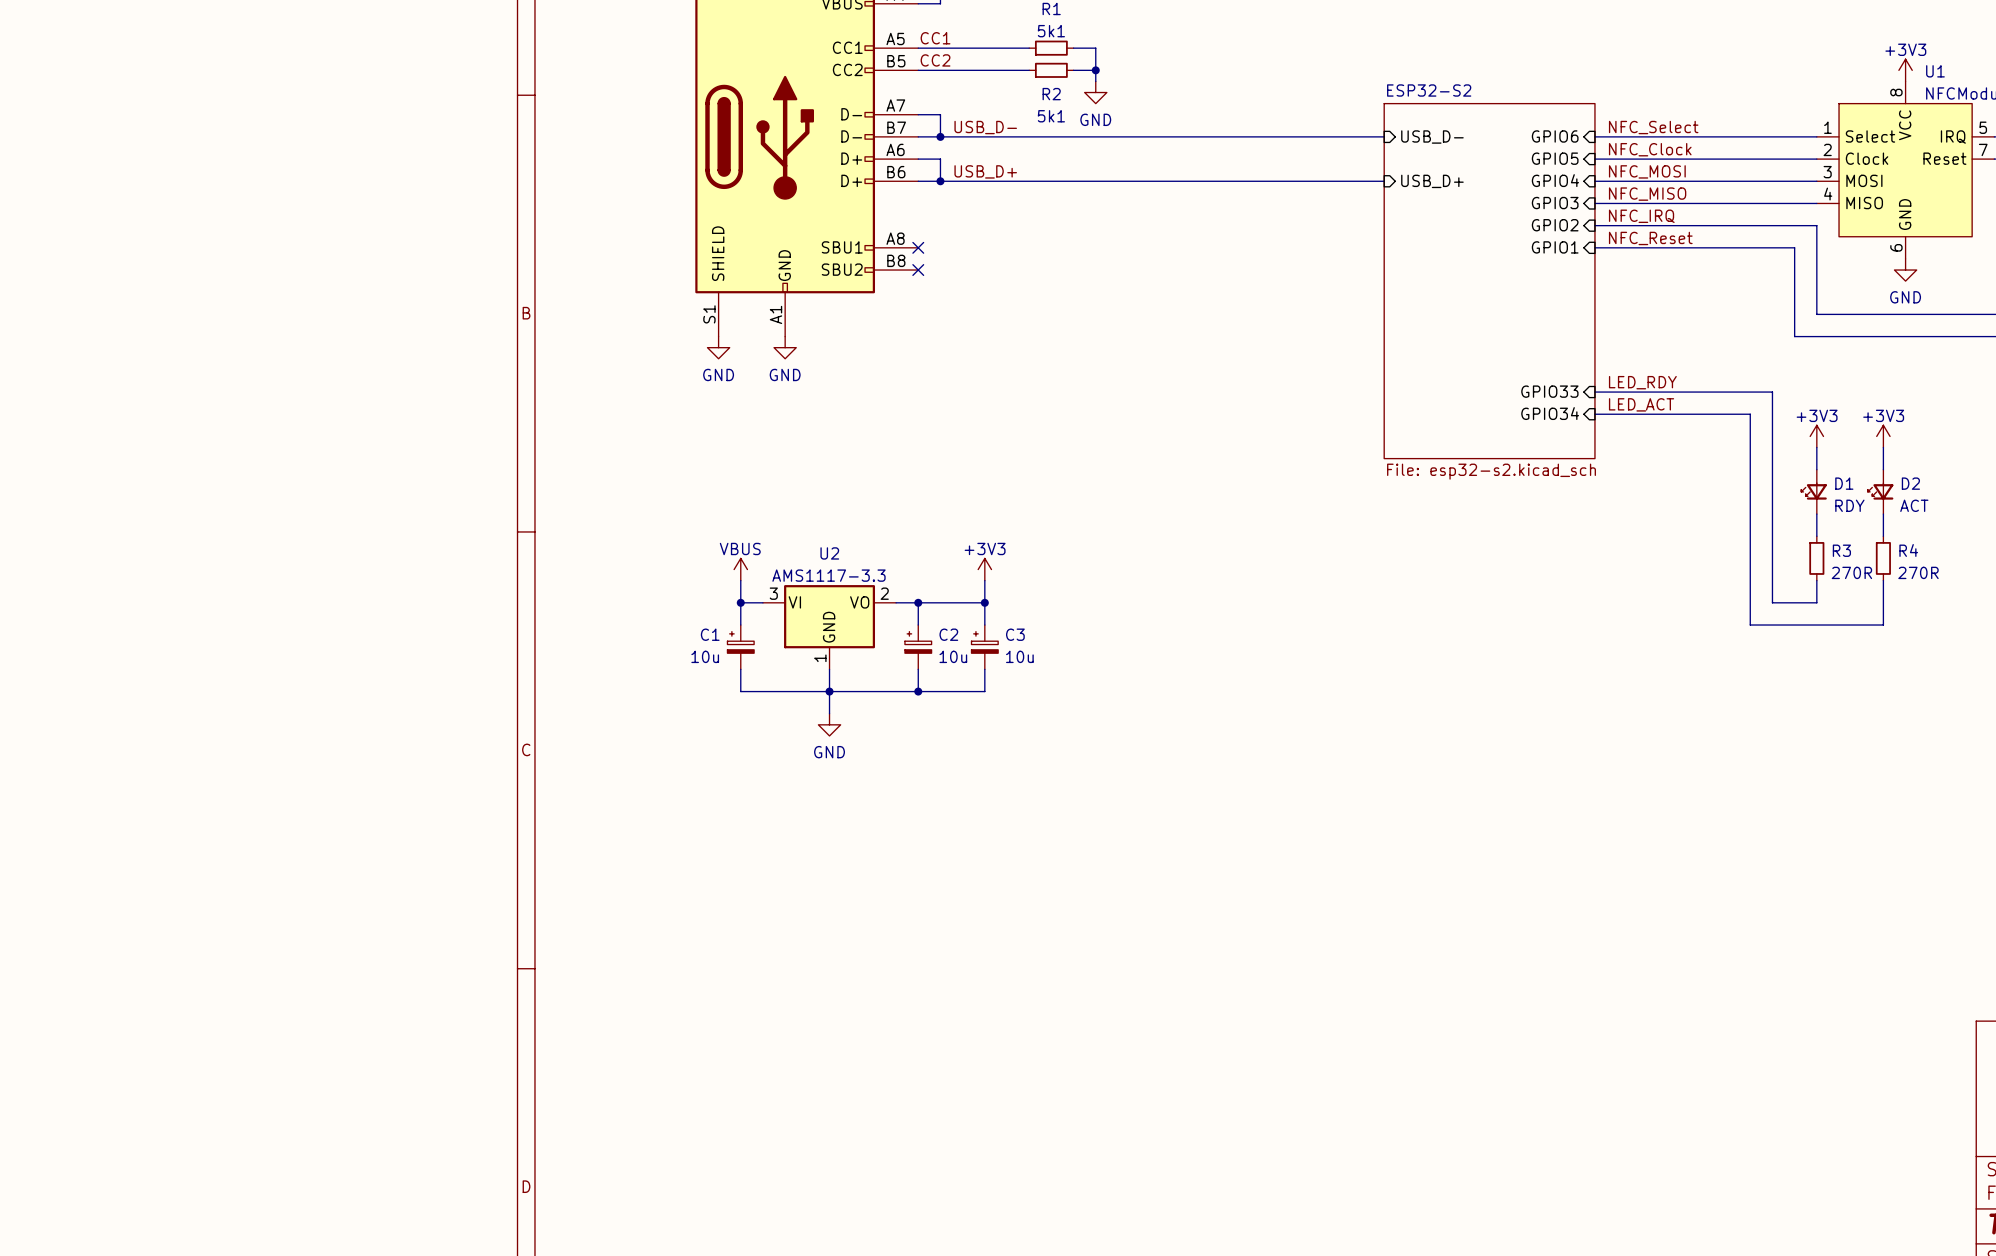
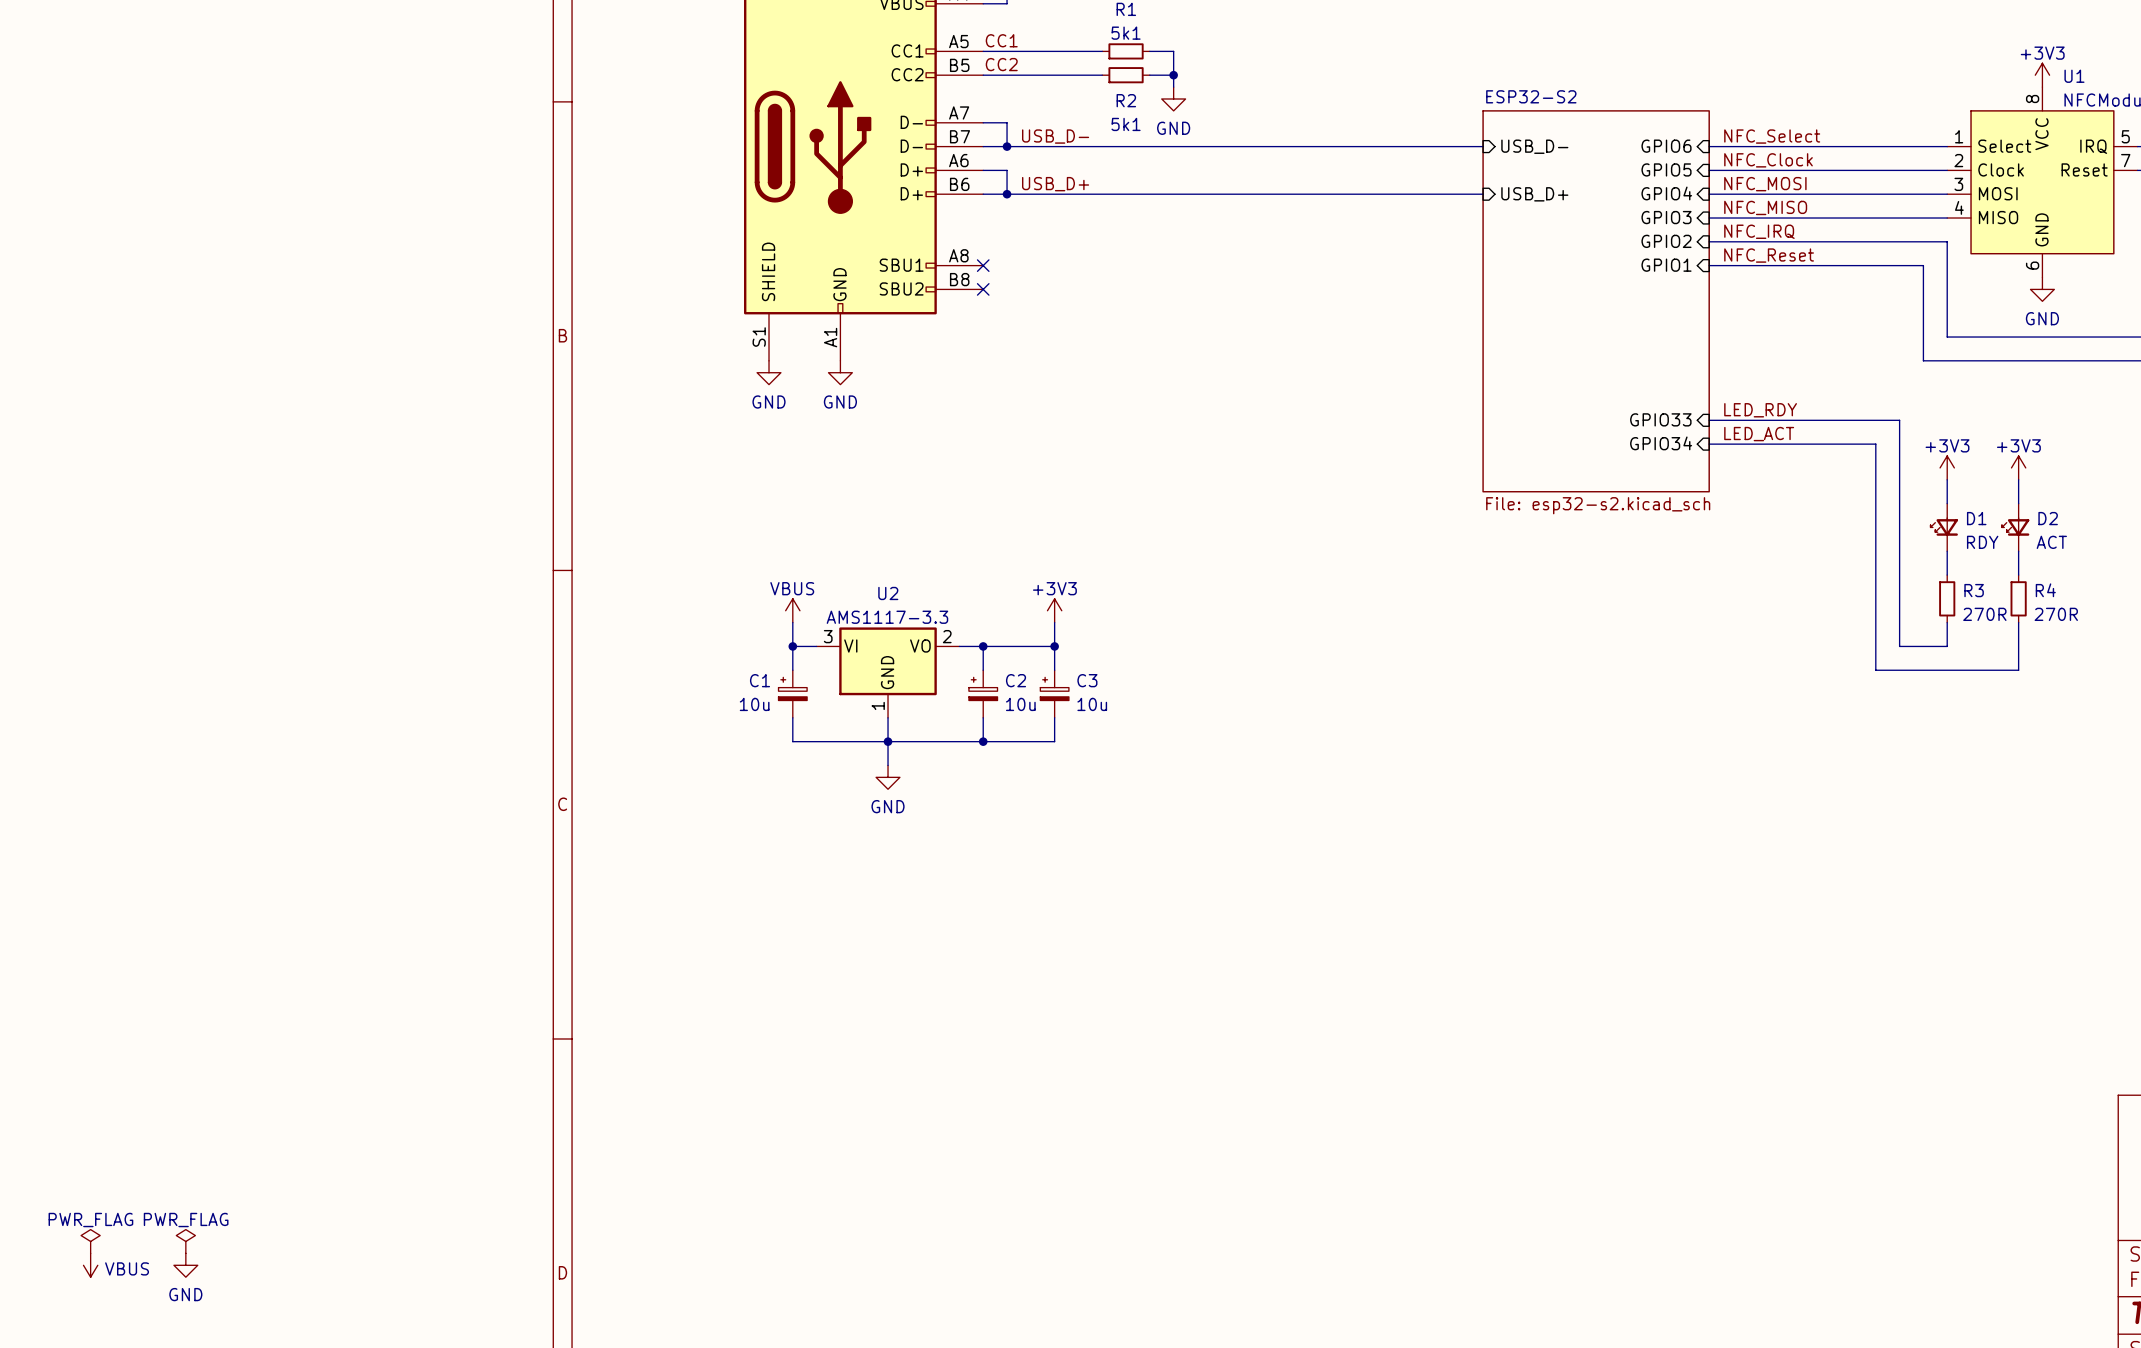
power symbol: none -> PWR_FLAG (90, 1241)
power symbol: none -> PWR_FLAG (185, 1241)
power symbol: none -> VBUS (90, 1265)
power symbol: none -> GND (185, 1265)

